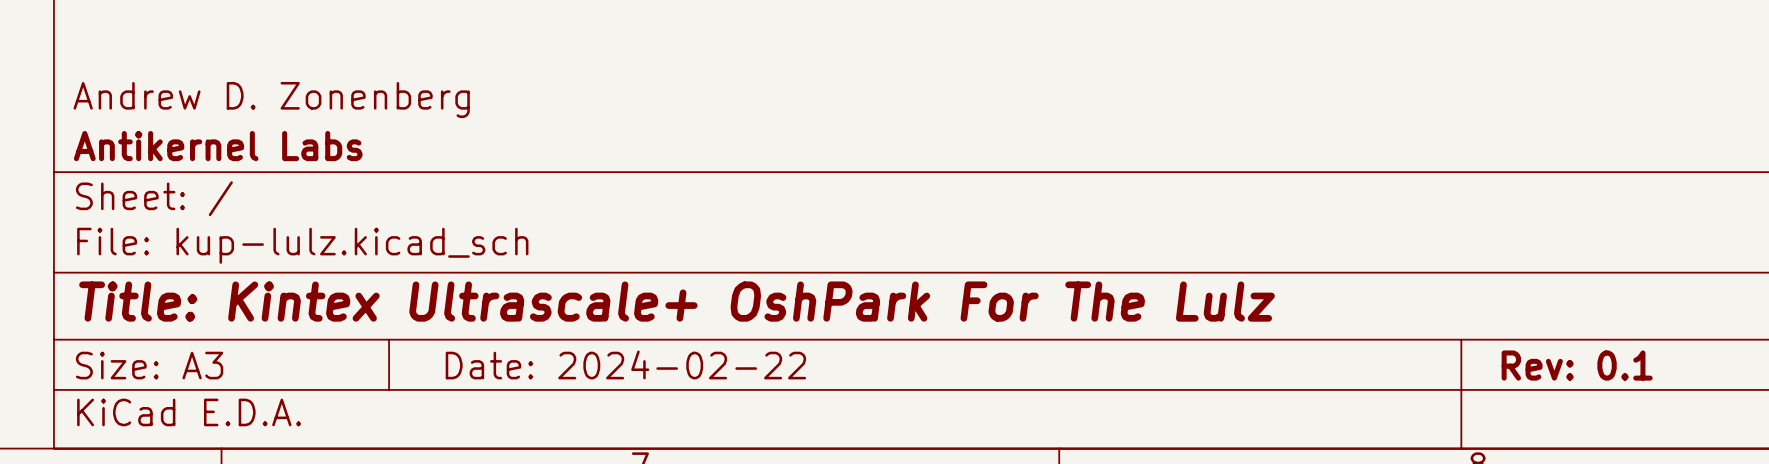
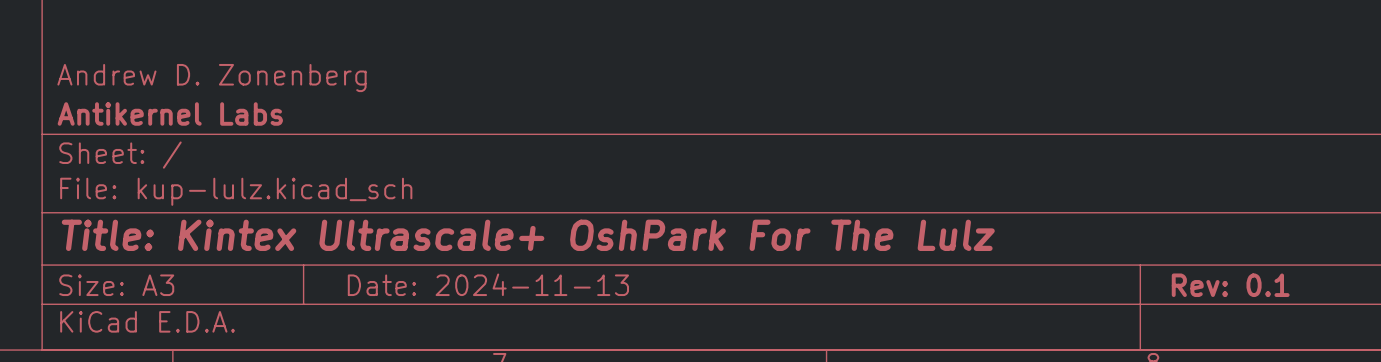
title block: Date: 2024-02-22 (625, 364) -> Date: 2024-11-13 (488, 284)

